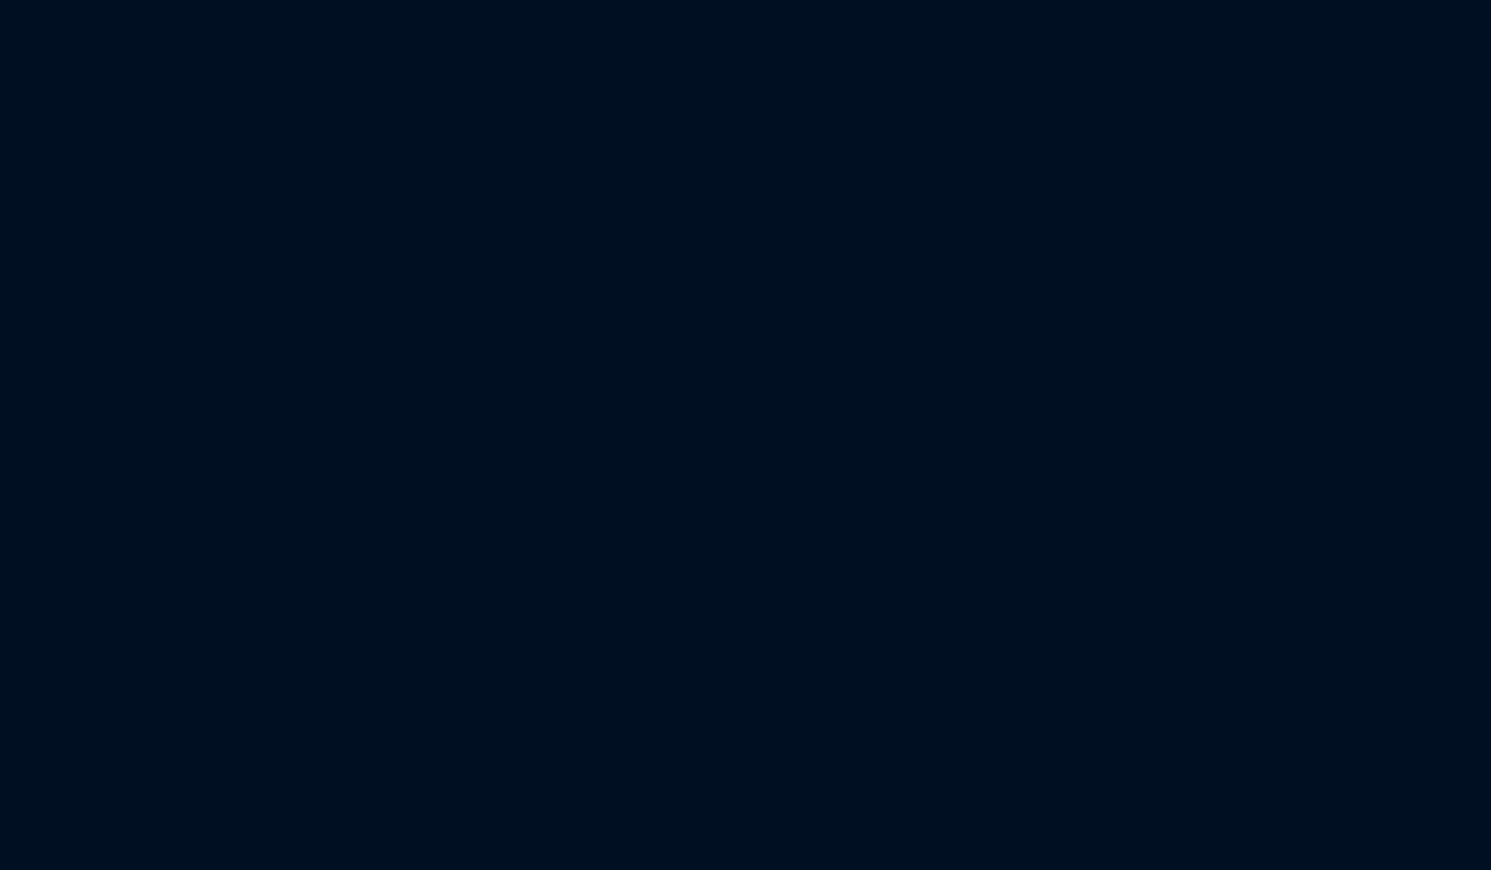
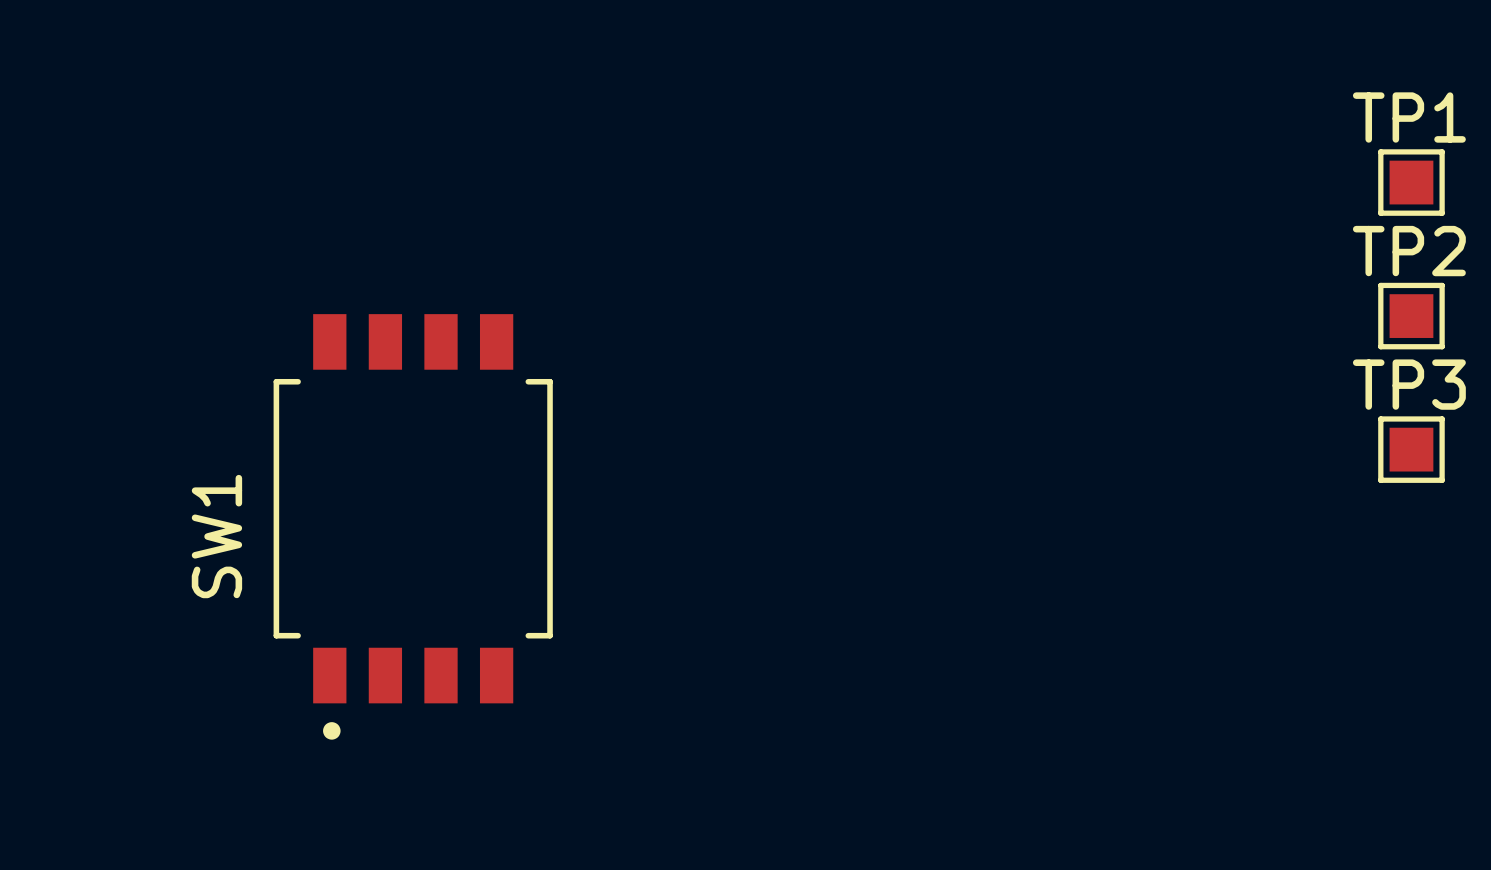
TP1: none -> (1411, 182)
TP2: none -> (1411, 316)
TP3: none -> (1411, 449)
SW1: none -> (413, 526)

